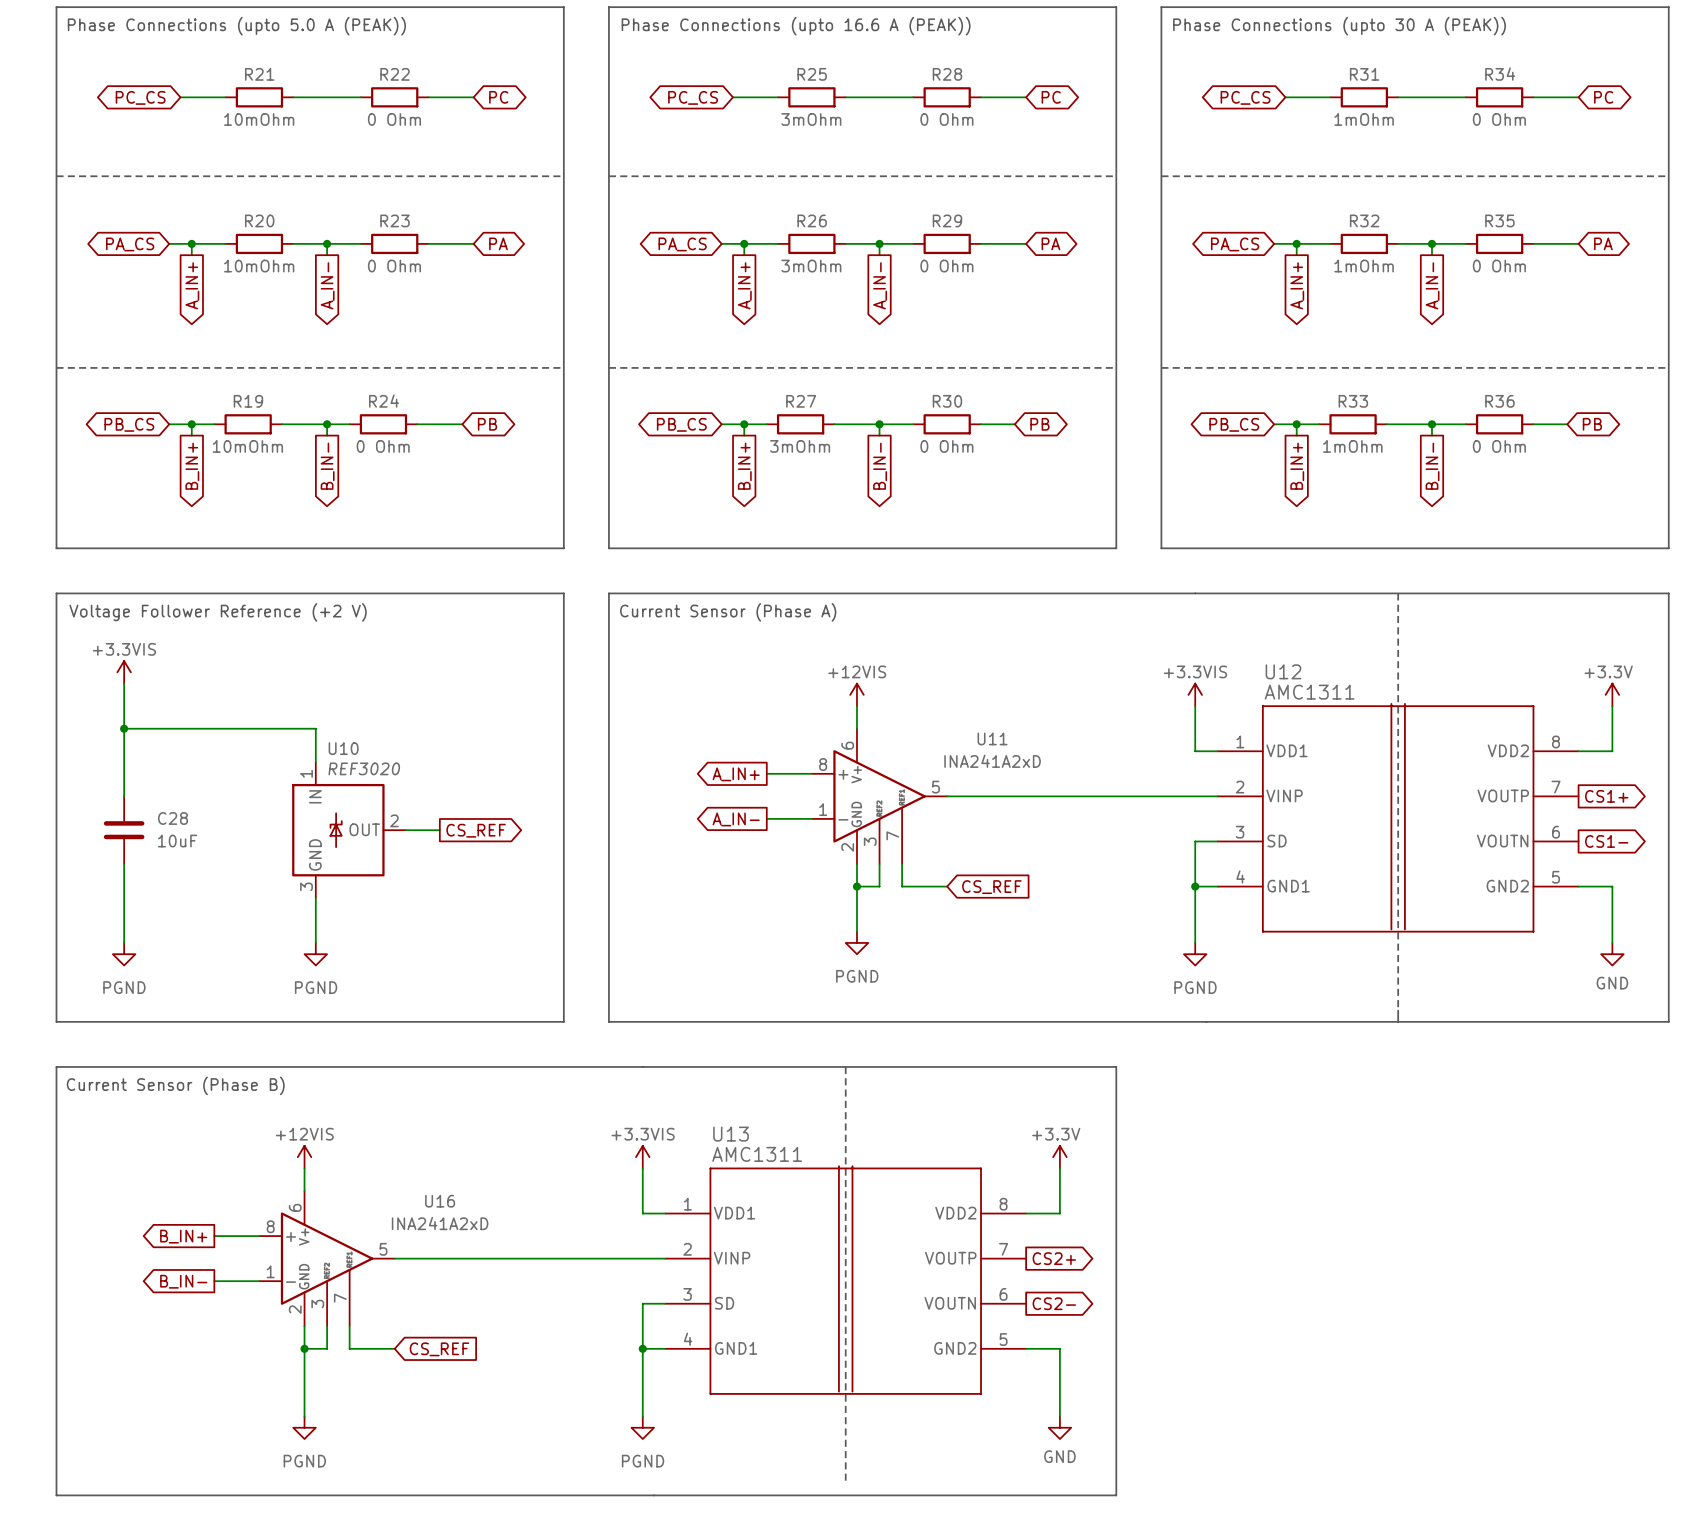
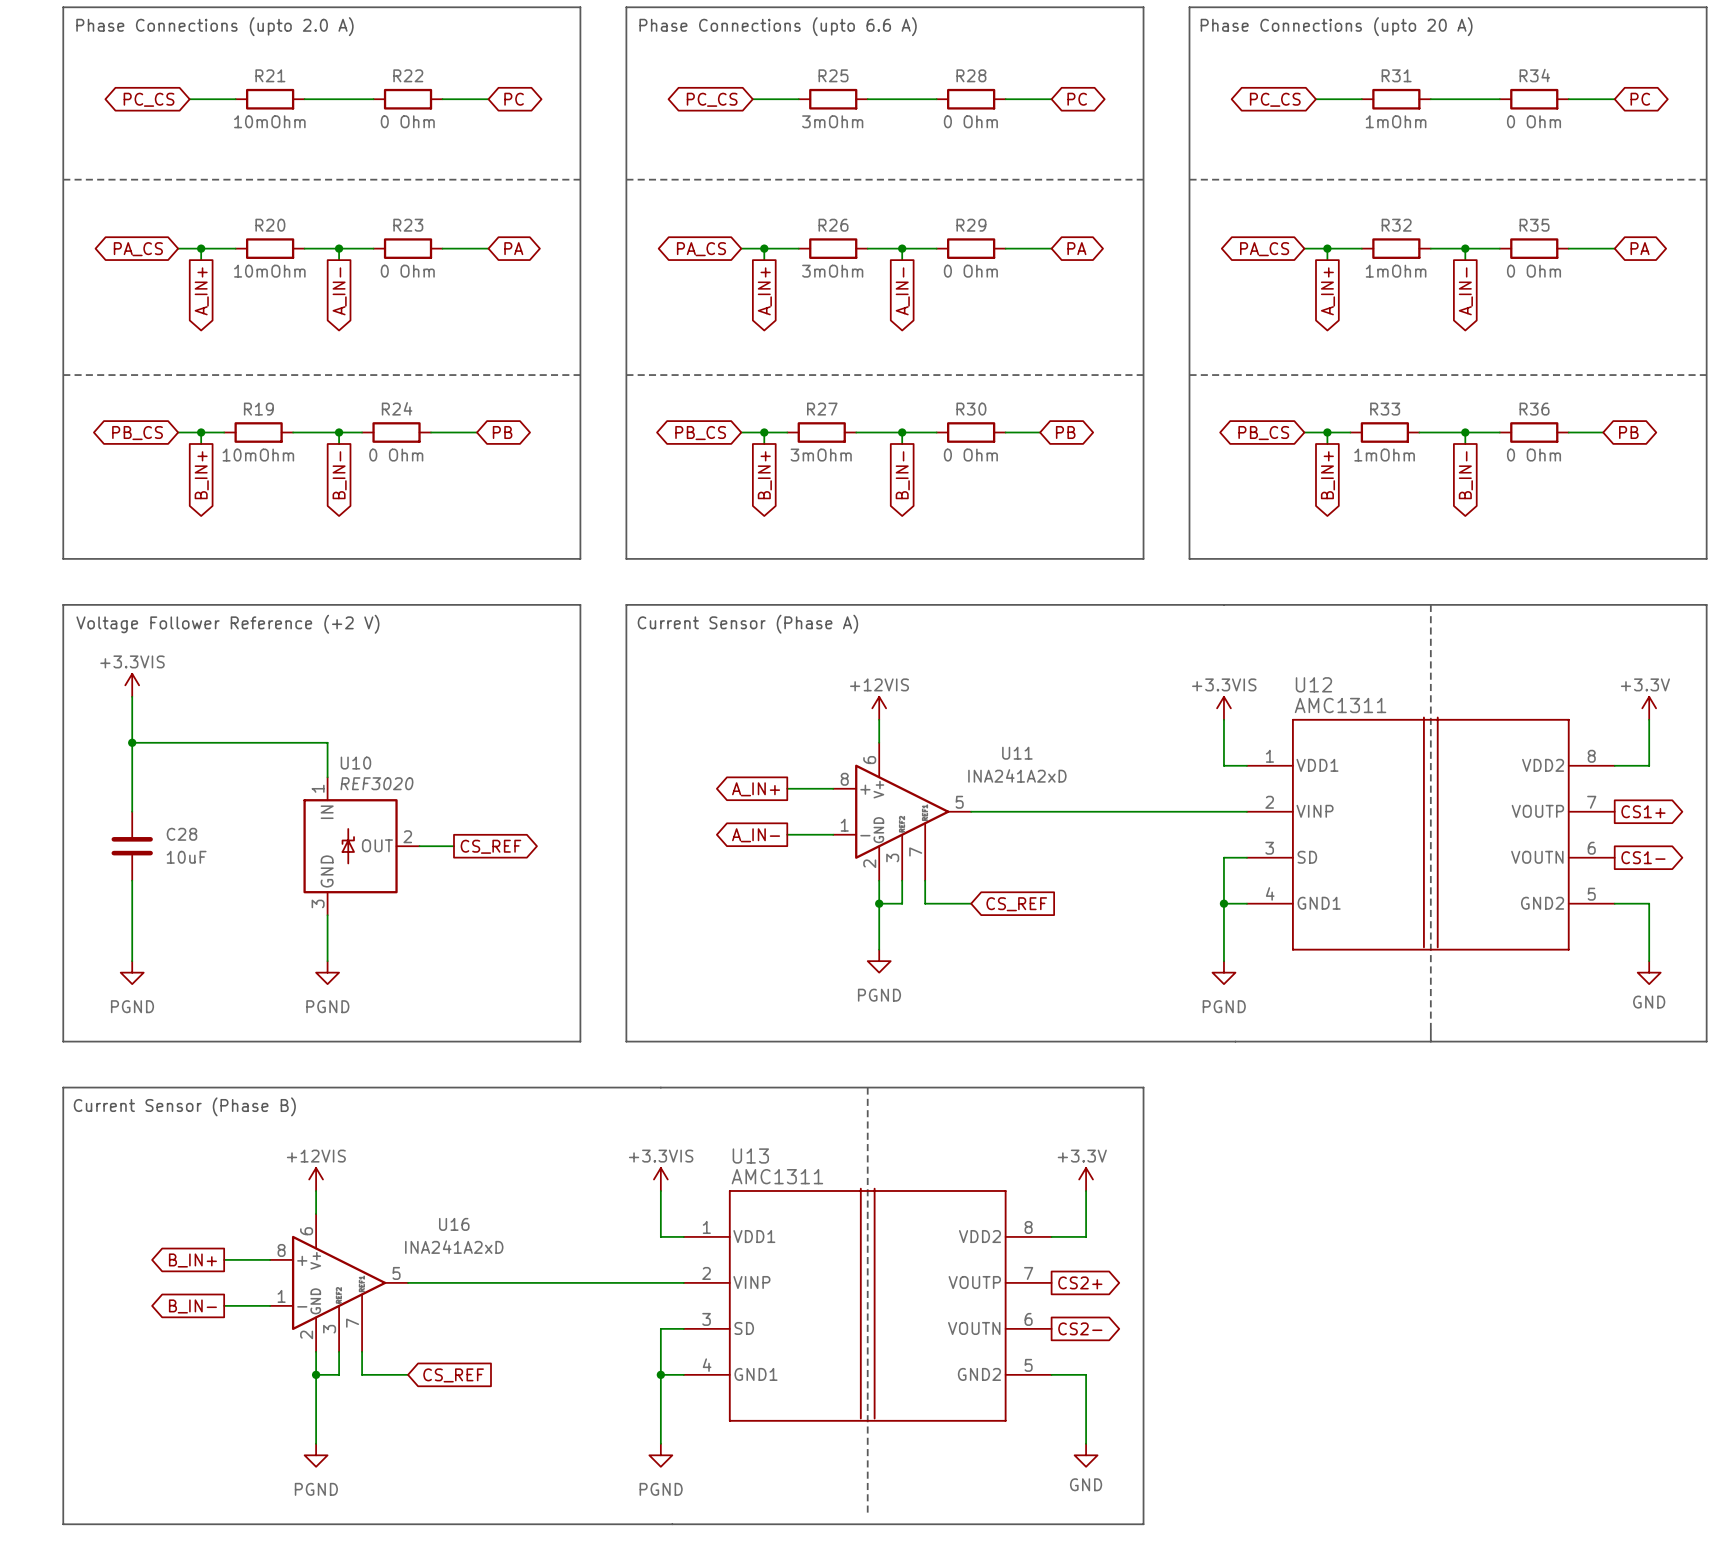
text: Phase Connections (upto 5.0 A (PEAK)) (236, 26) -> Phase Connections (upto 2.0 A) (214, 26)
text: Phase Connections (upto 16.6 A (PEAK)) (796, 26) -> Phase Connections (upto 6.6 A) (778, 26)
text: Phase Connections (upto 30 A (PEAK)) (1339, 26) -> Phase Connections (upto 20 A) (1336, 26)

